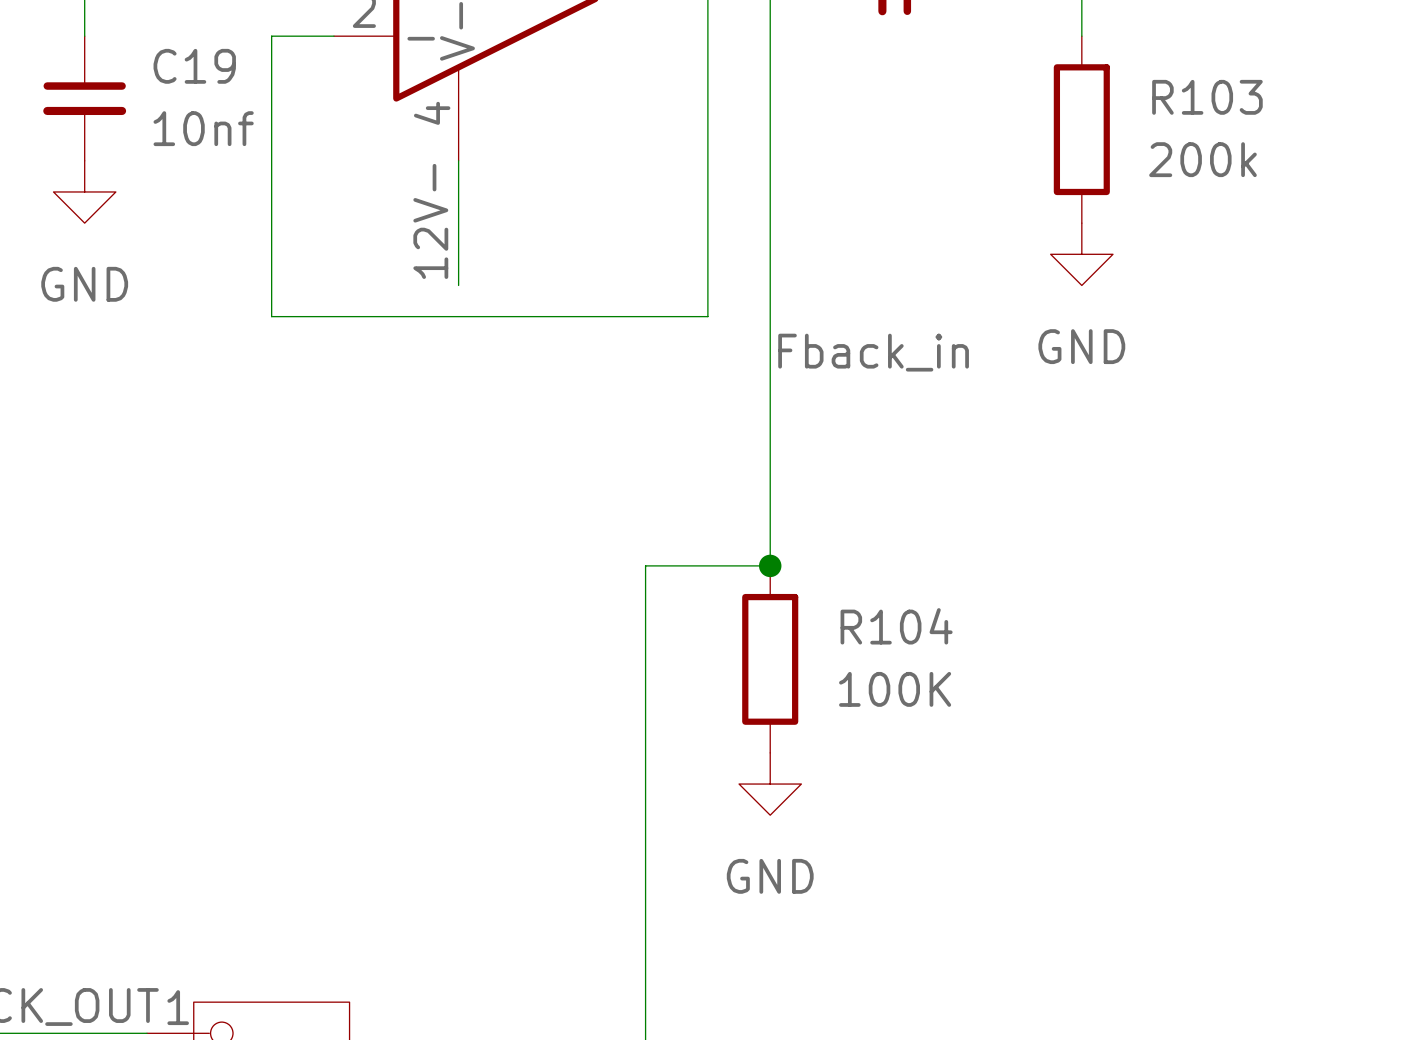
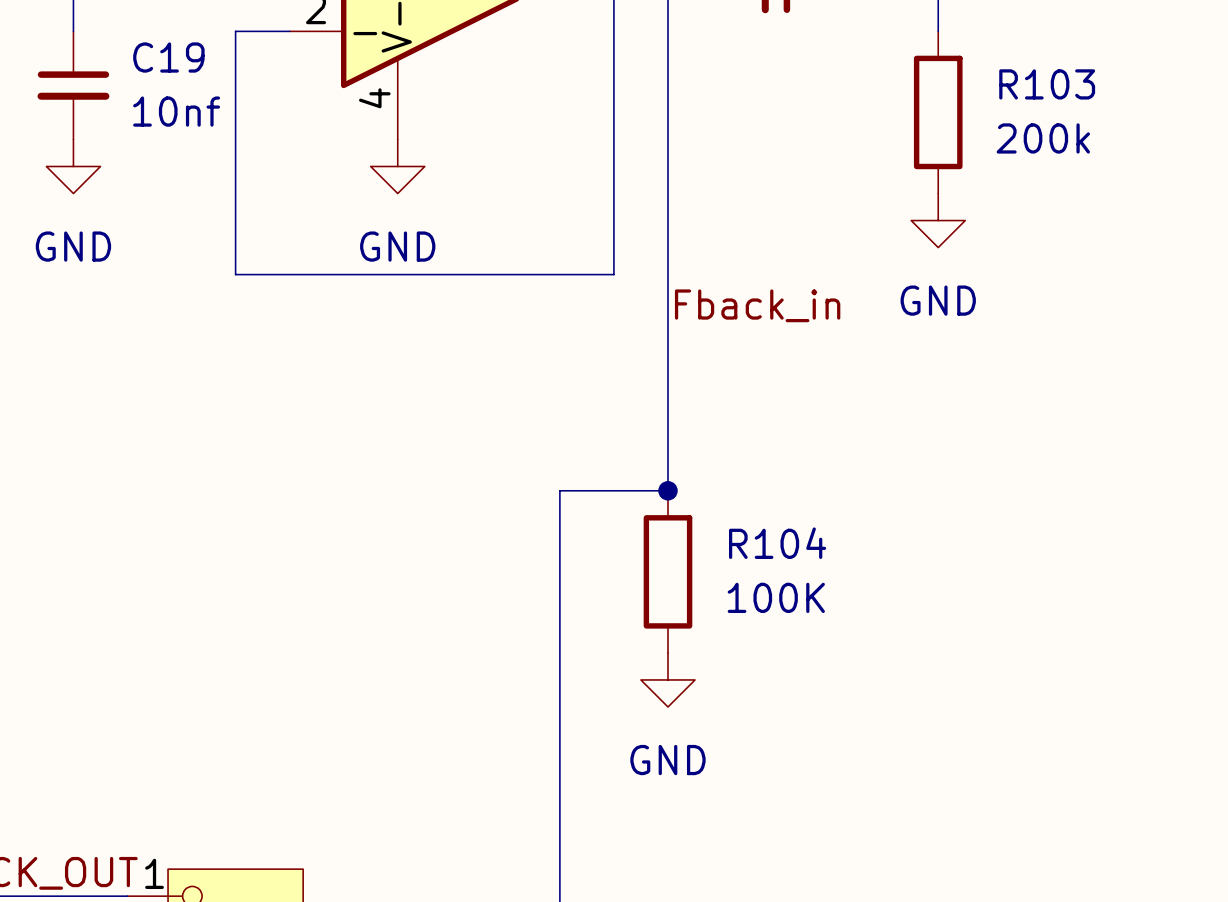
wire: (458, 160) (458, 285) -> none
power symbol: none -> GND (397, 166)
label: 12V- (430, 221) -> none

